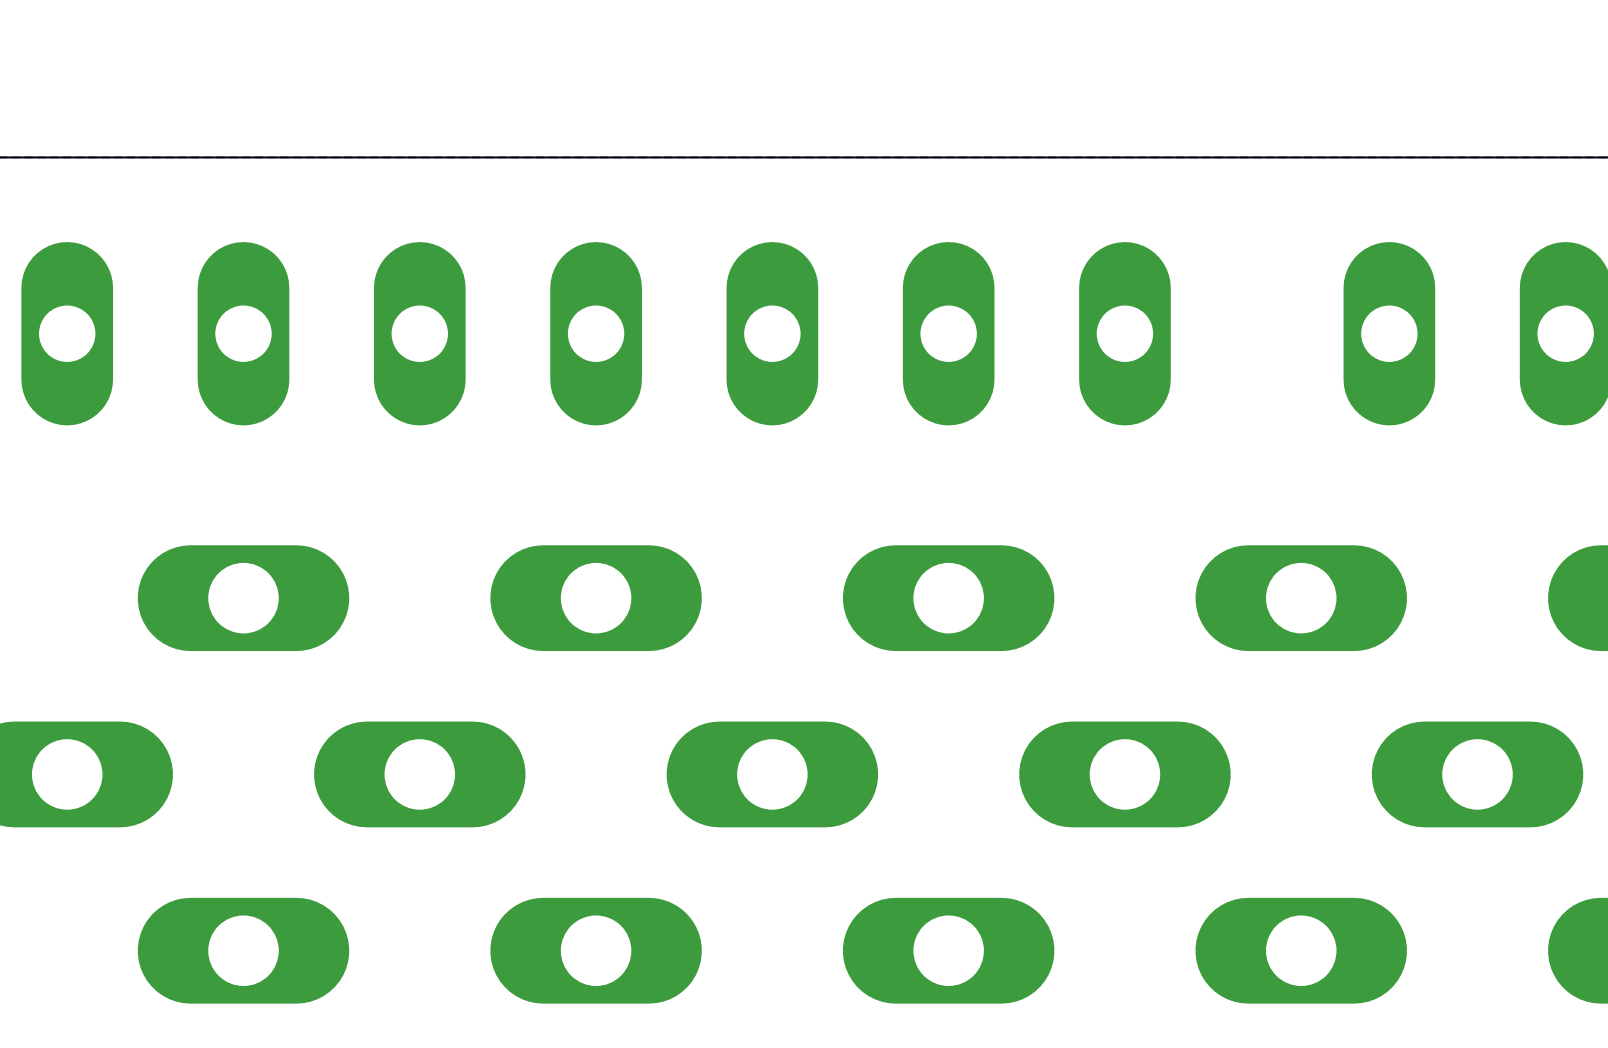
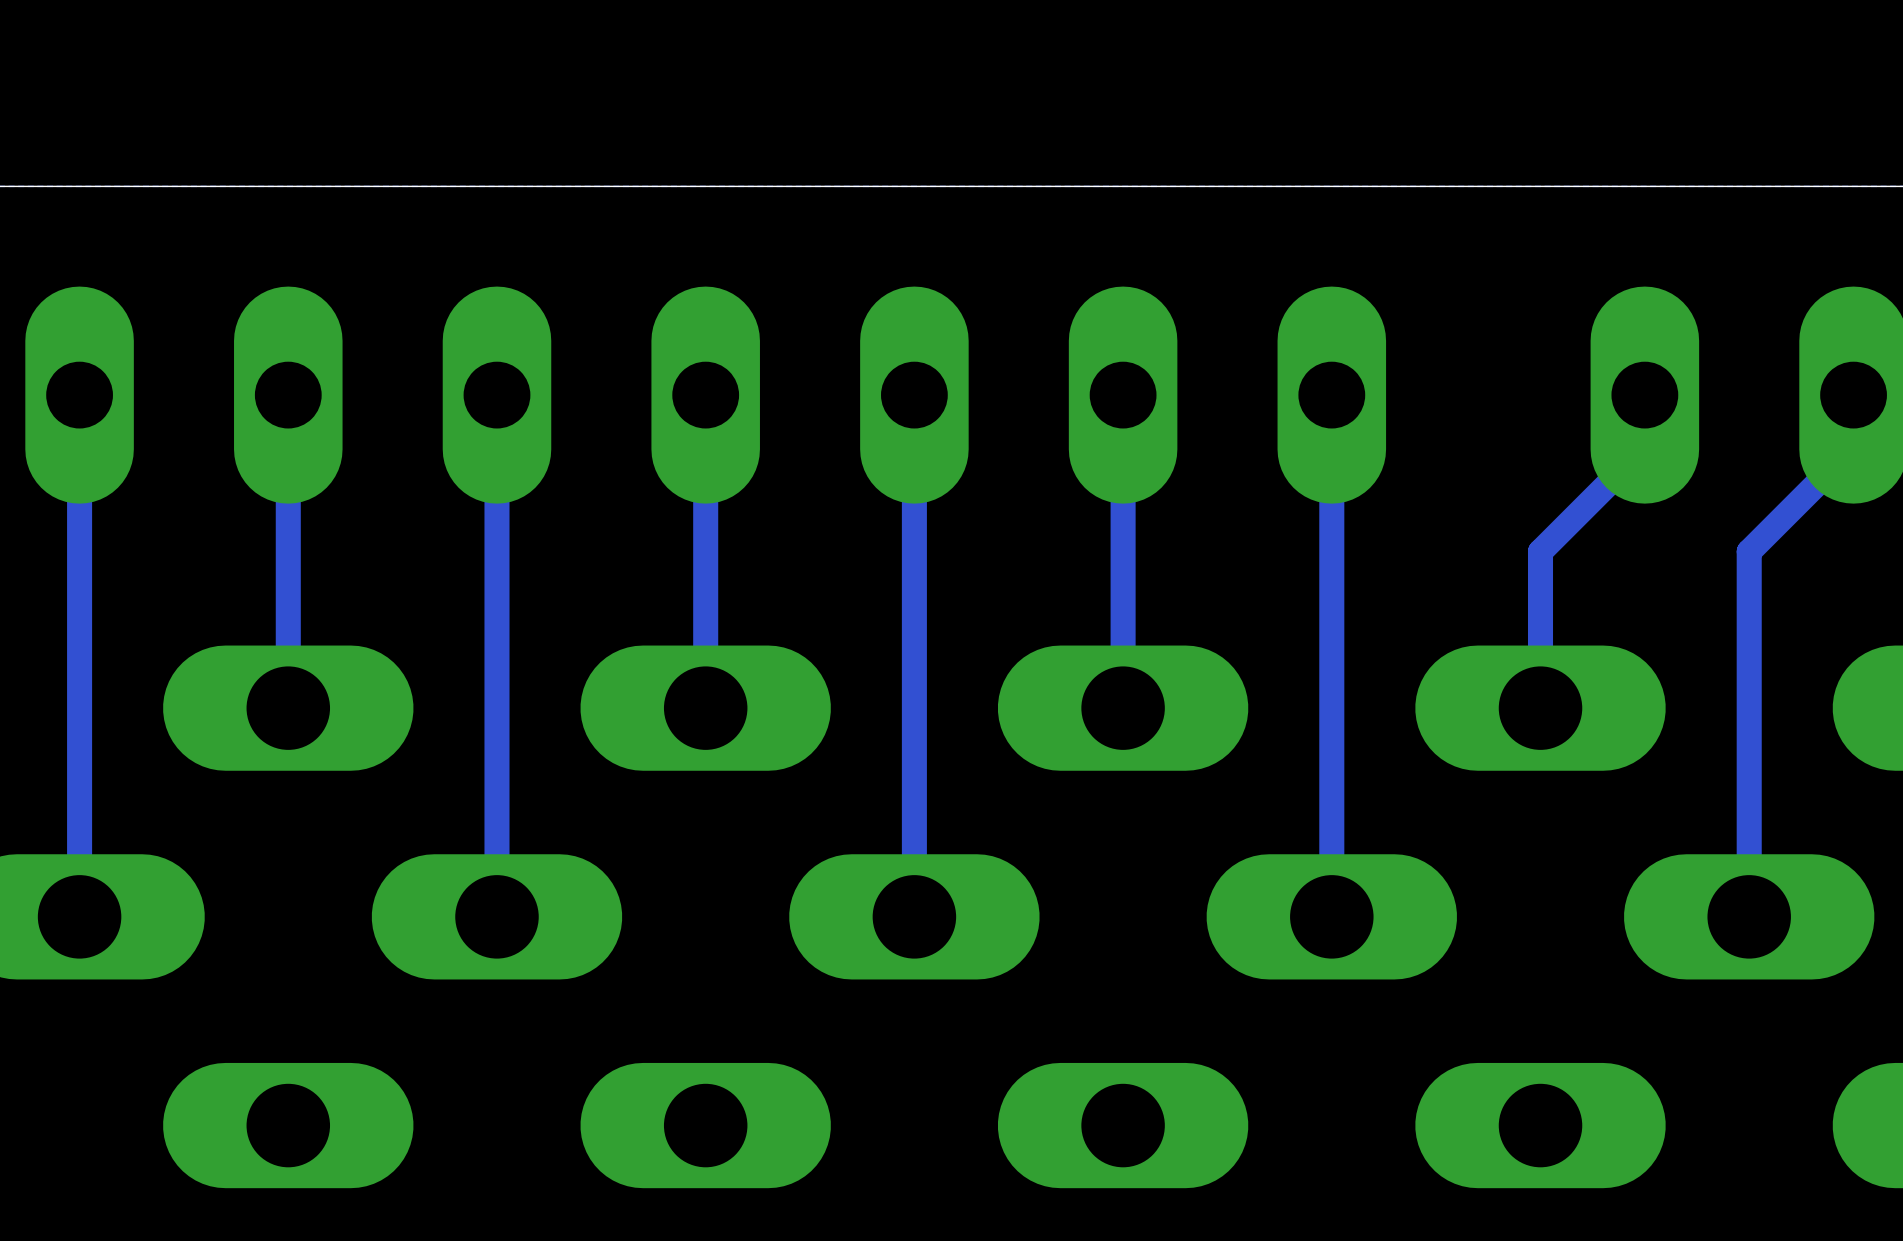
track: none -> (79, 395) (79, 916)
track: none -> (288, 395) (288, 708)
track: none -> (496, 395) (496, 916)
track: none -> (705, 395) (705, 708)
track: none -> (914, 395) (914, 916)
track: none -> (1123, 395) (1123, 708)
track: none -> (1331, 395) (1331, 916)
track: none -> (1644, 395) (1644, 447) (1540, 551) (1540, 708)
track: none -> (1853, 395) (1853, 447) (1749, 551) (1749, 916)

